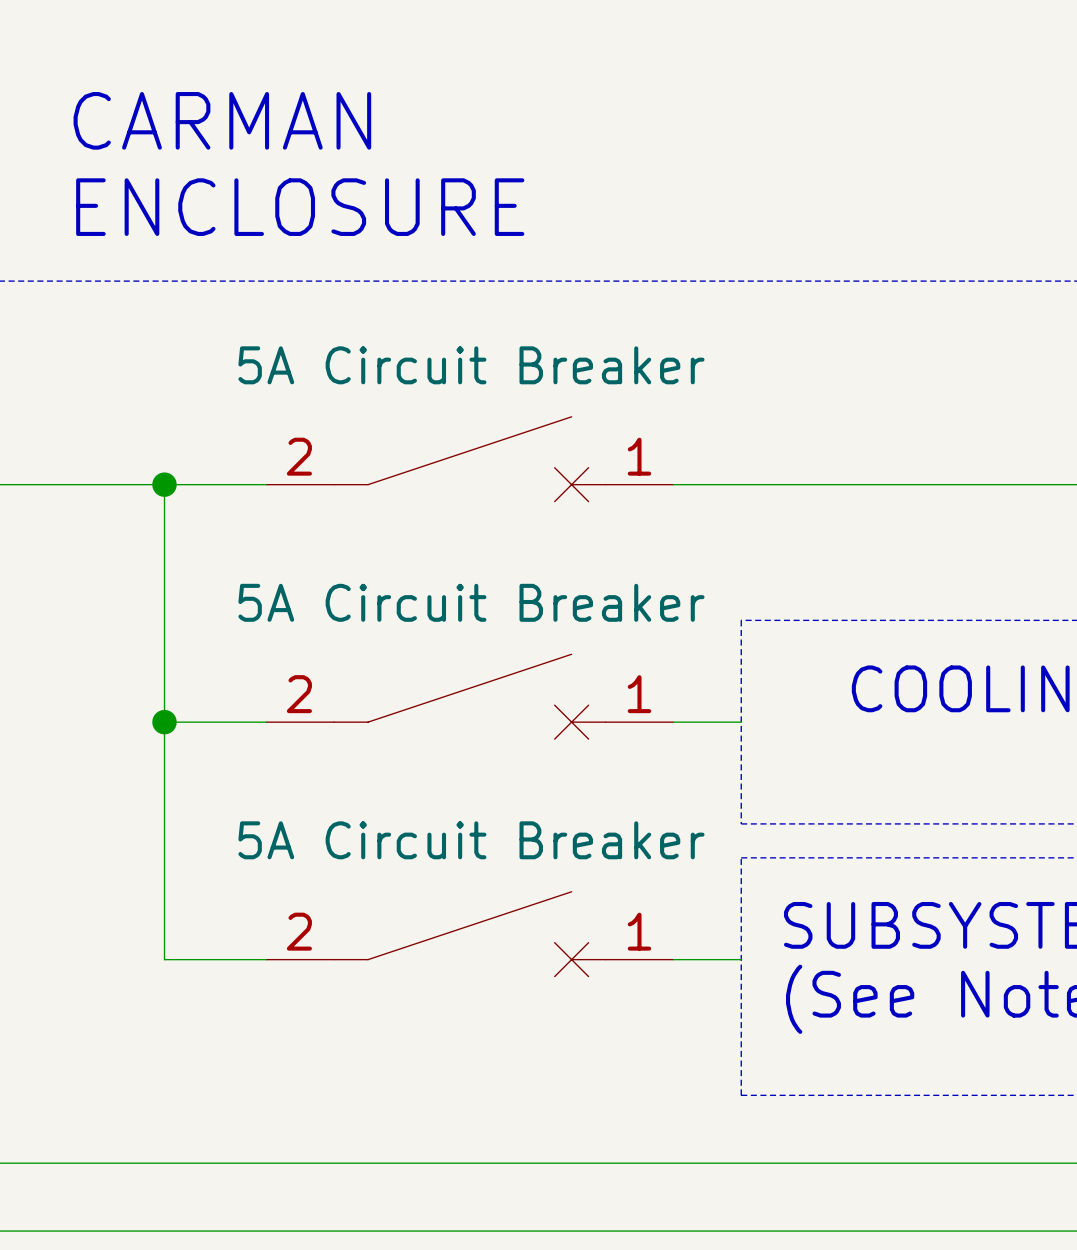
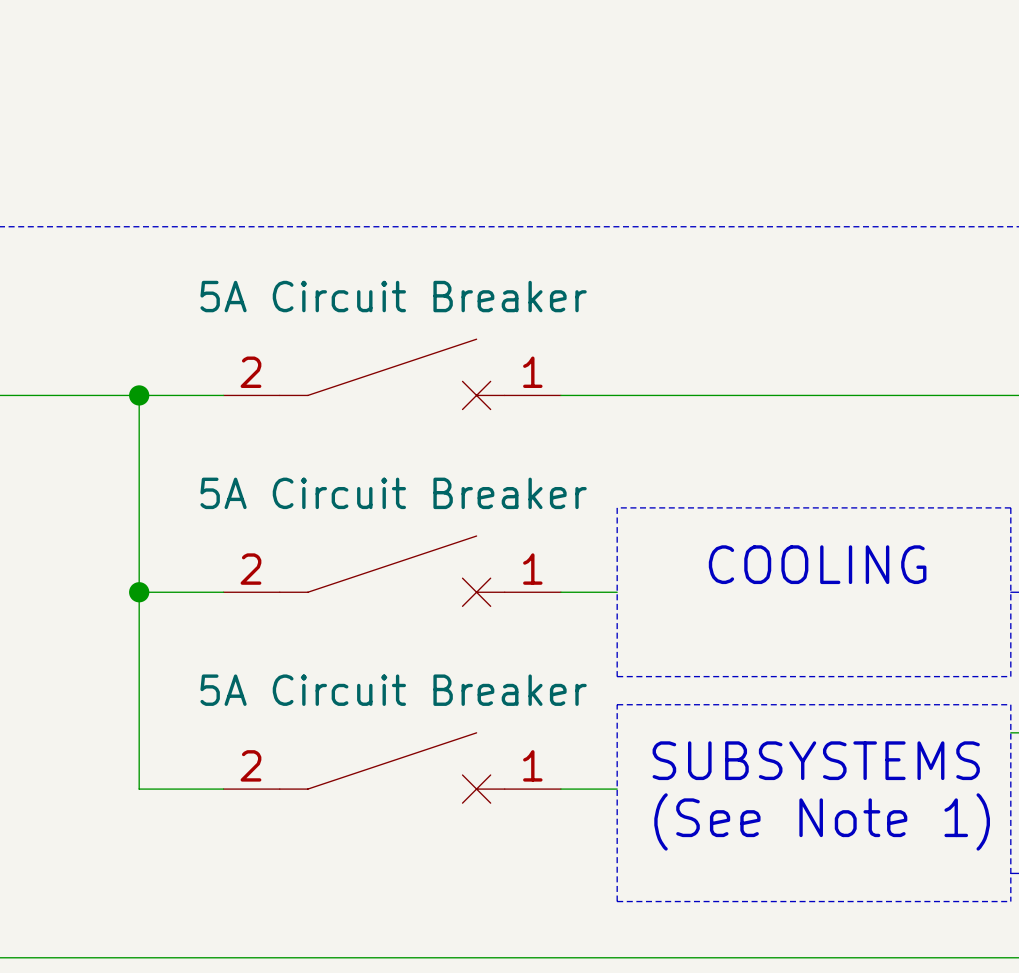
text: CARMAN (222, 120) -> none
text: ENCLOSURE (300, 207) -> none

